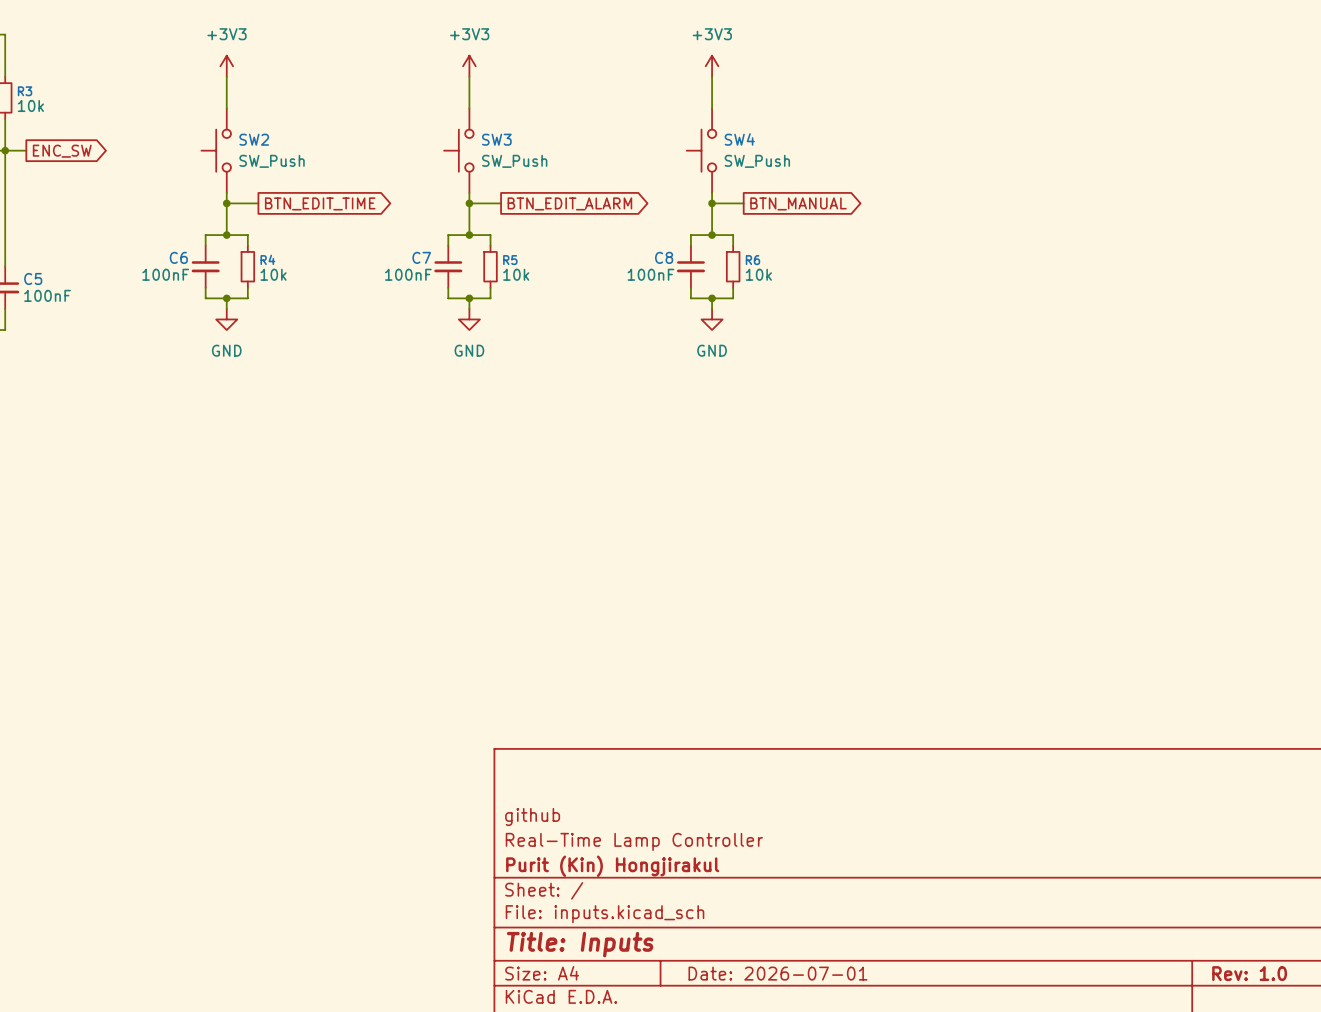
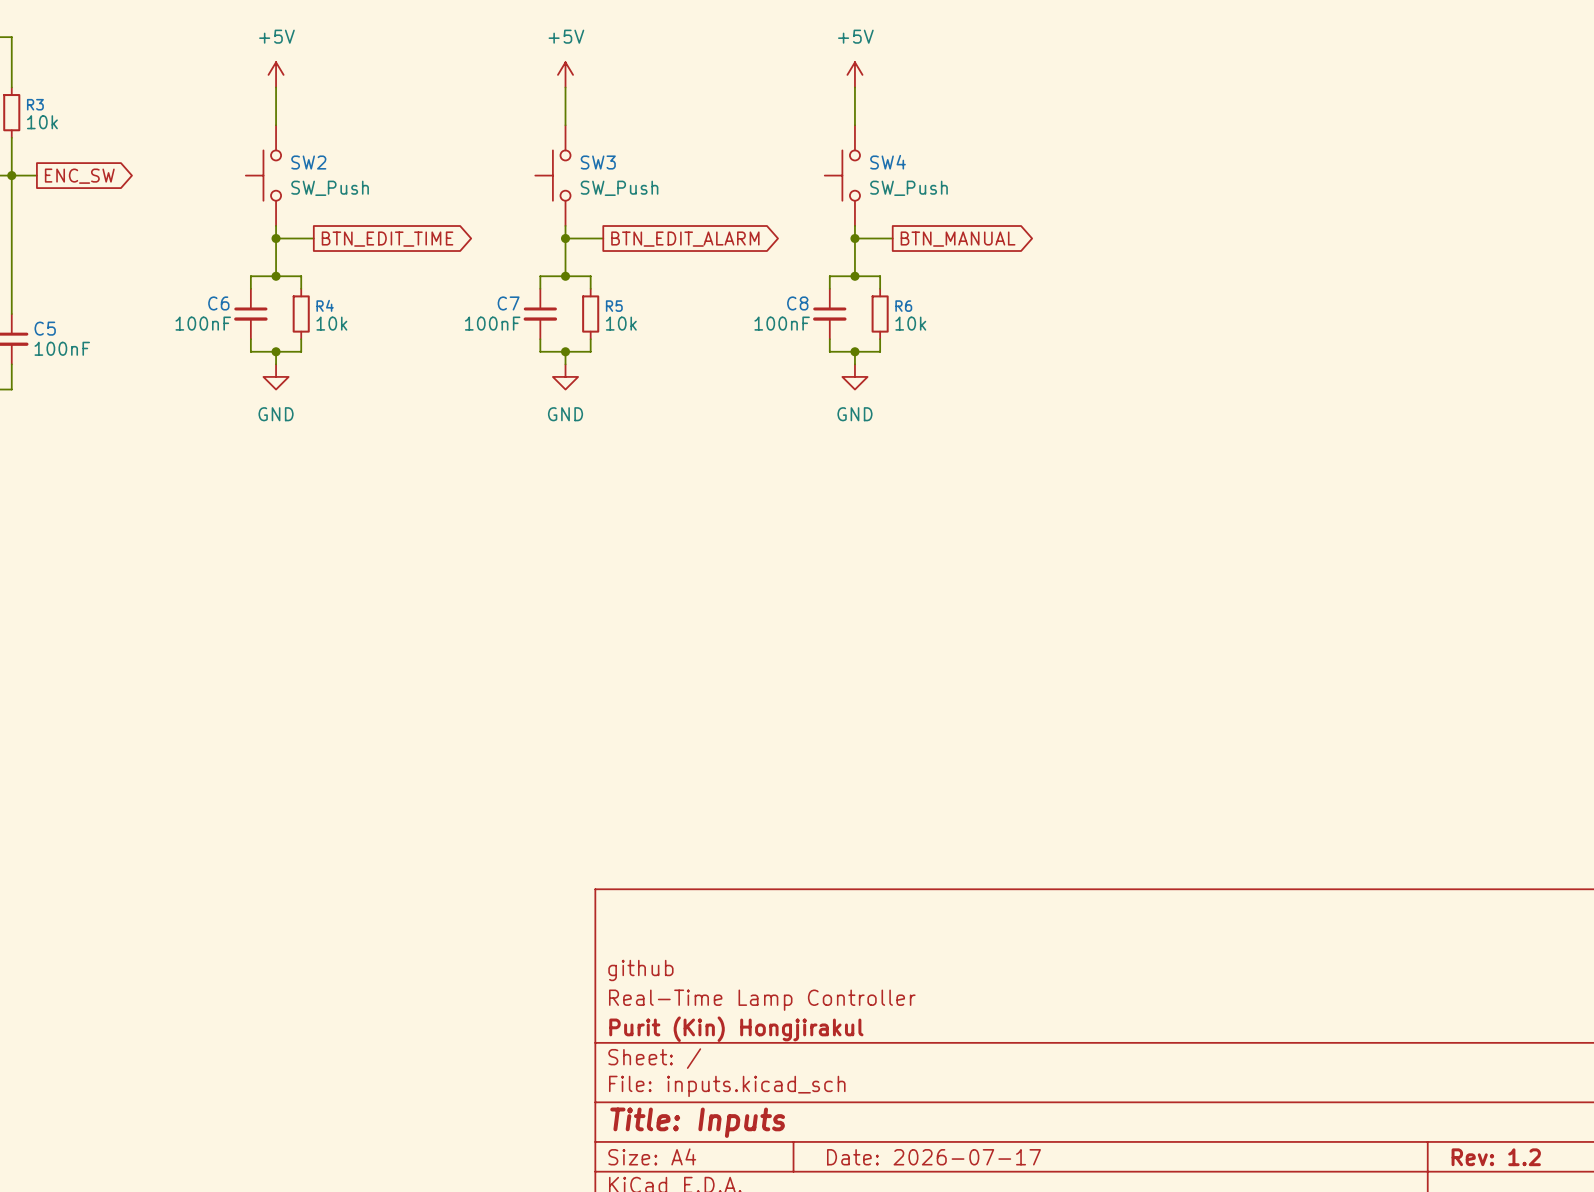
power symbol: +3V3 (226, 66) -> +5V (276, 74)
power symbol: +3V3 (469, 66) -> +5V (565, 74)
power symbol: +3V3 (712, 66) -> +5V (854, 74)
title block: Date: 2026-07-01 (777, 973) -> Date: 2026-07-17 (933, 1157)
title block: Rev: 1.0 (1249, 973) -> Rev: 1.2 (1496, 1157)

